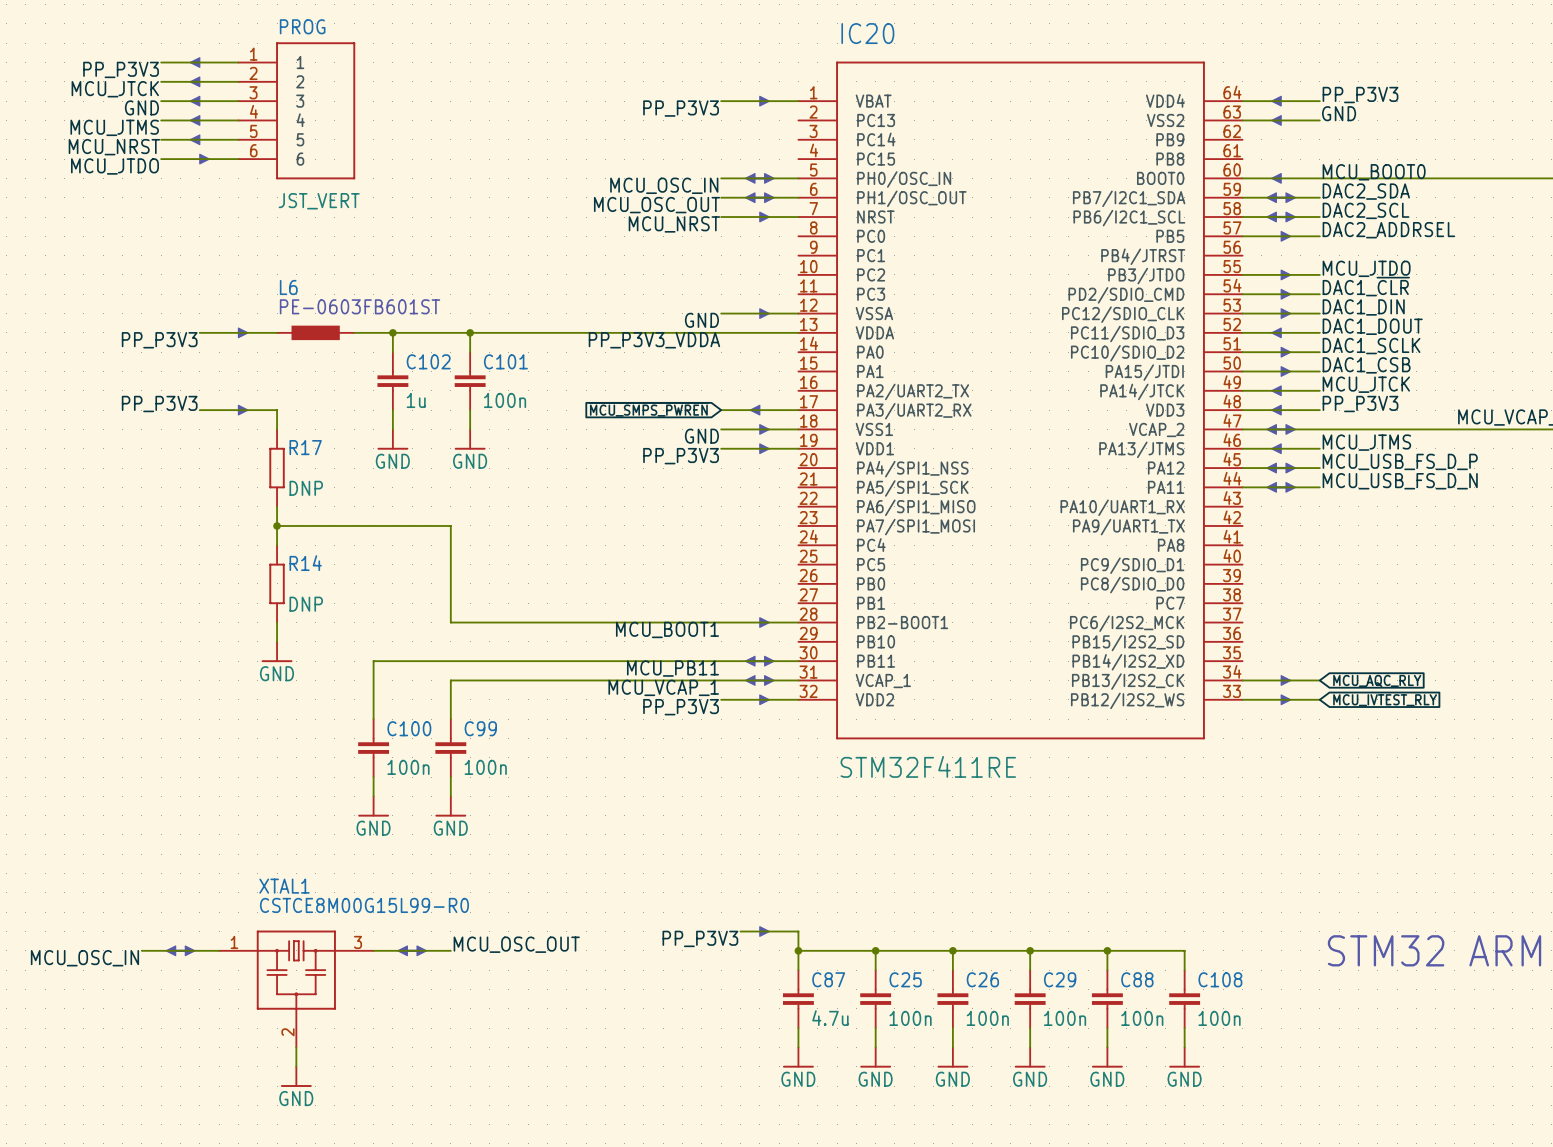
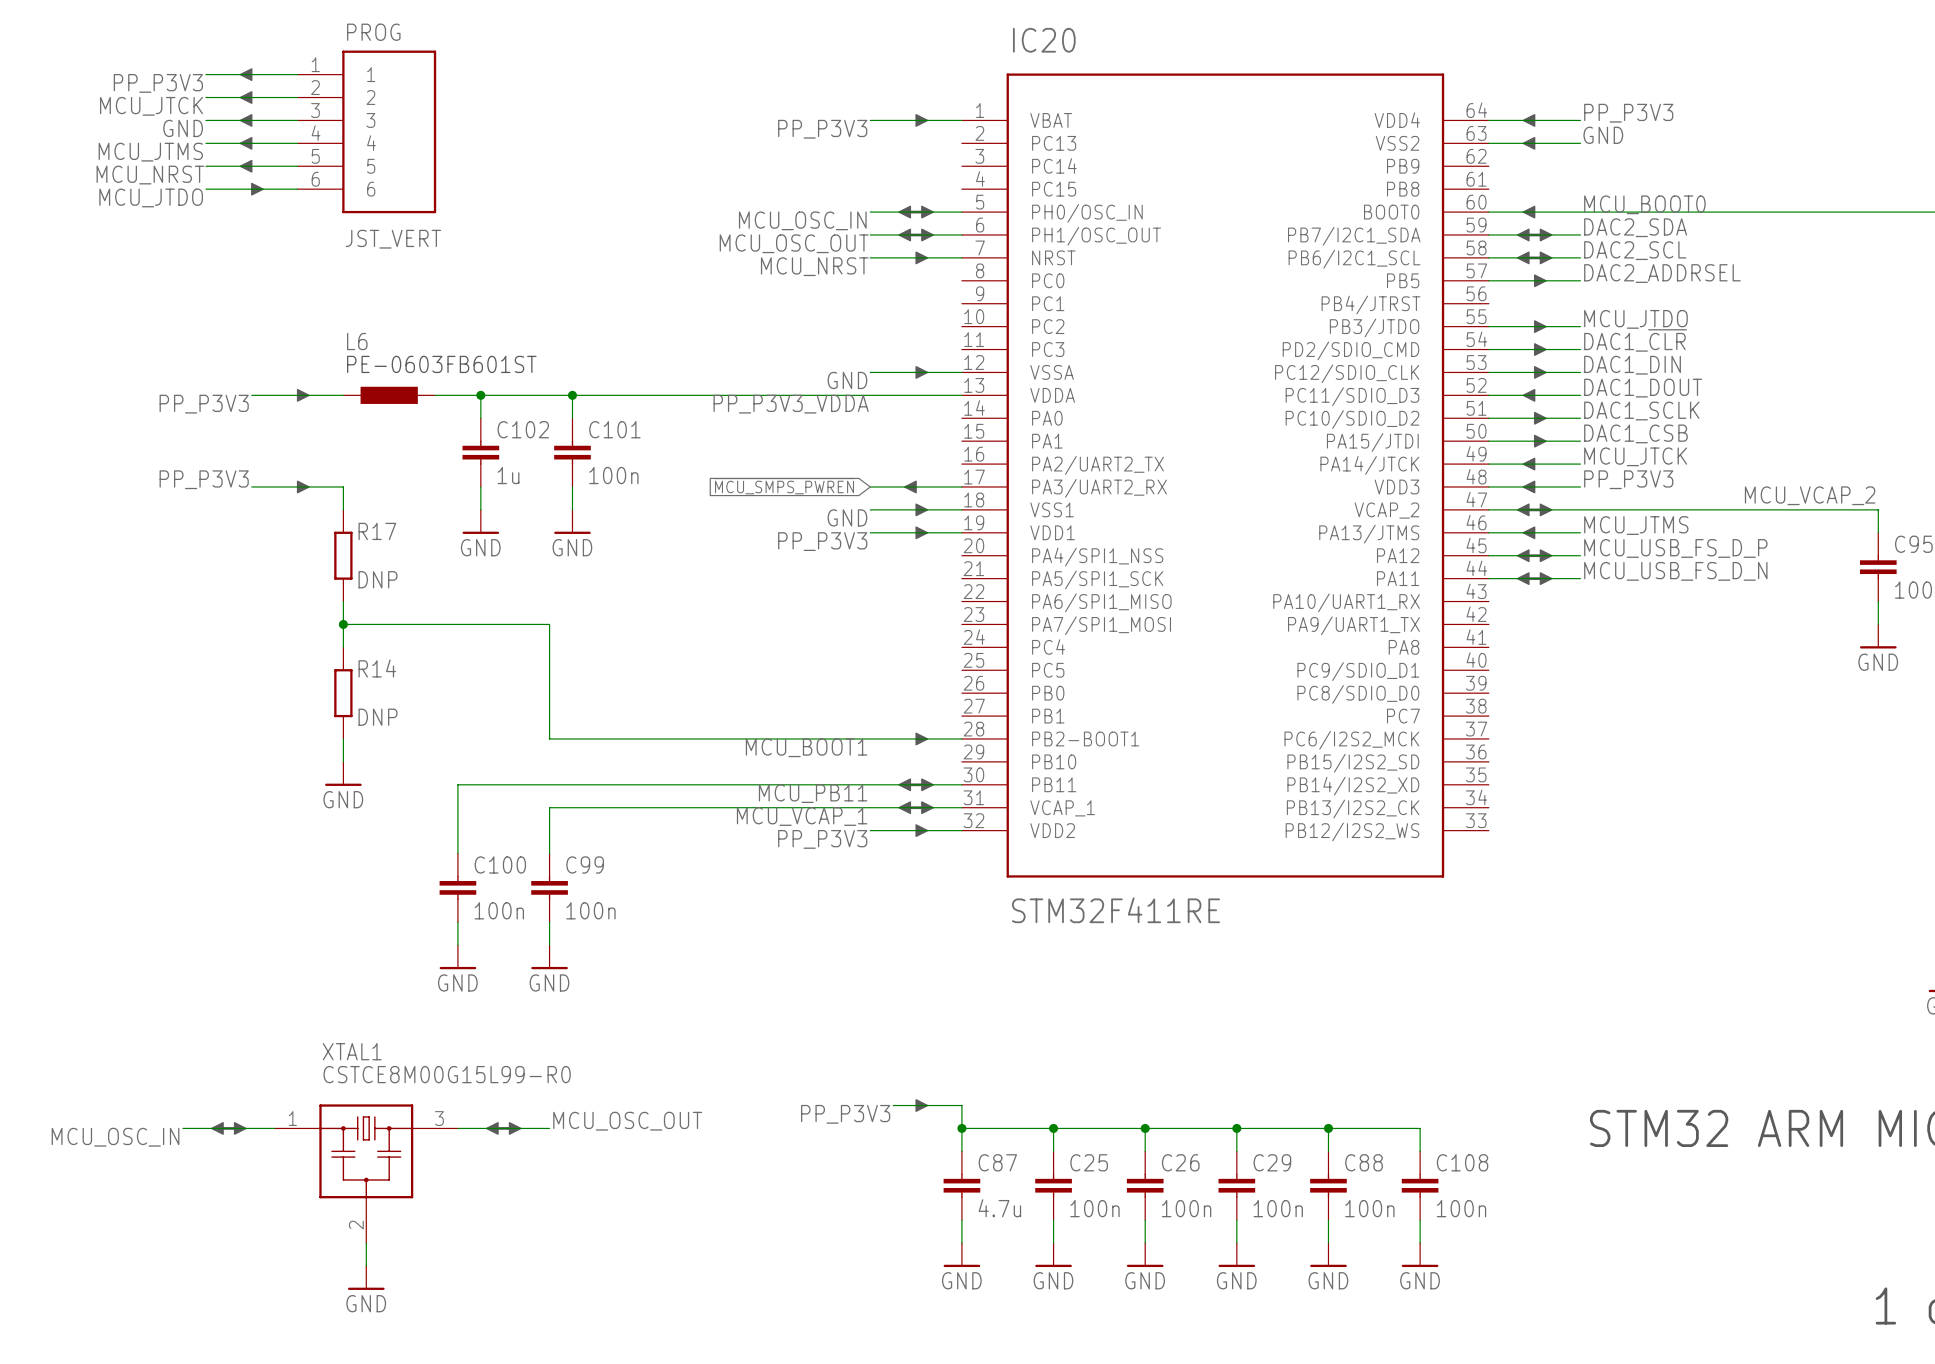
wire: (1242, 680) (1319, 680) -> none
part: (1286, 680) -> none
global label: MCU_AQC_RLY (1377, 680) -> none
wire: (1242, 699) (1319, 699) -> none
part: (1286, 699) -> none
global label: MCU_IVTEST_RLY (1385, 700) -> none

